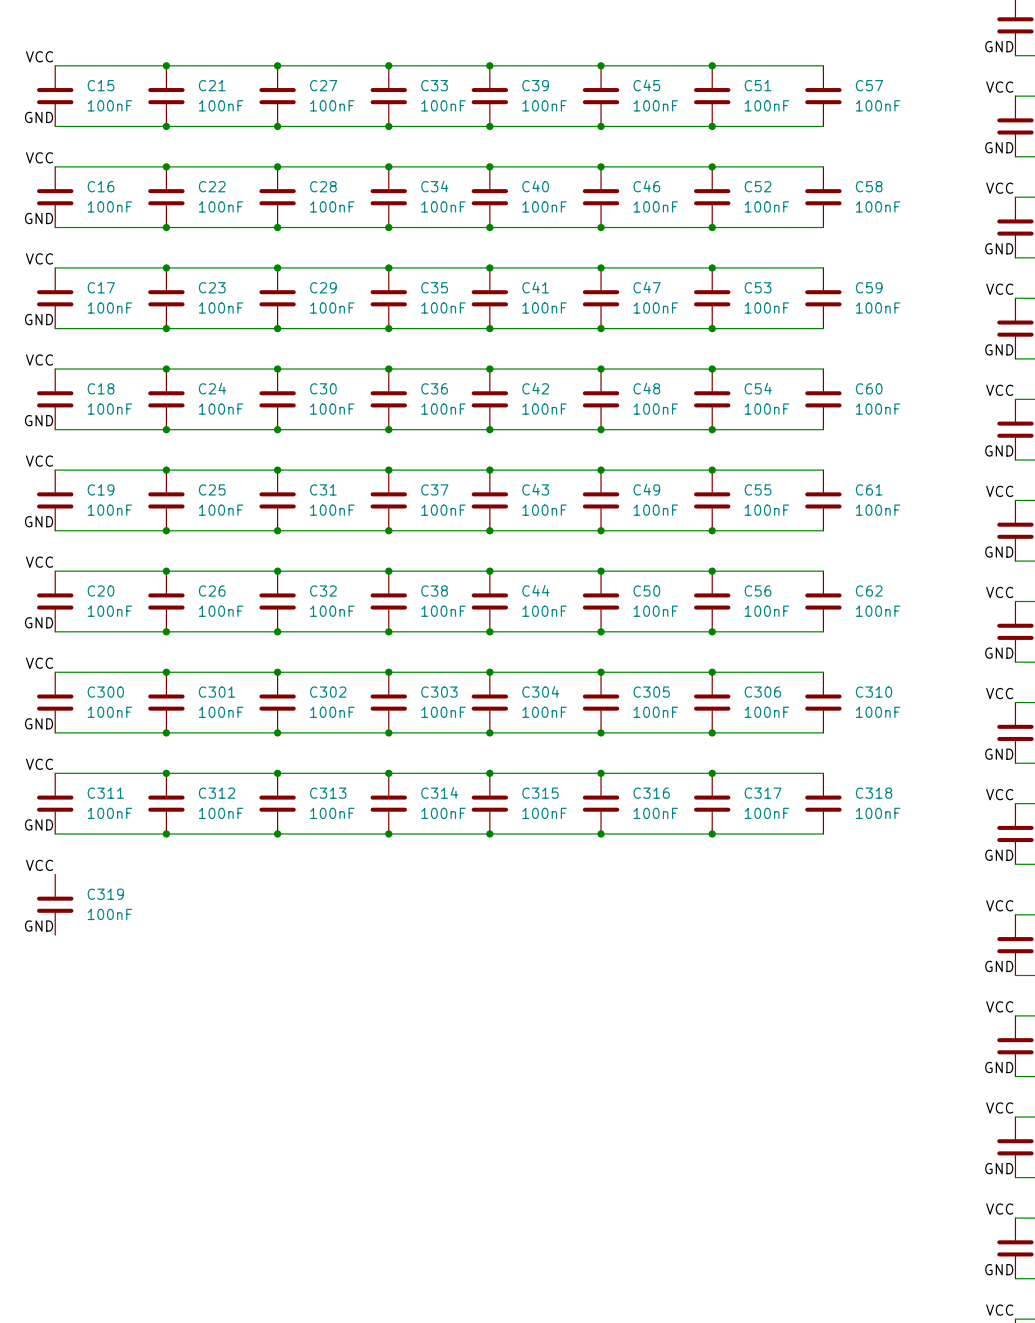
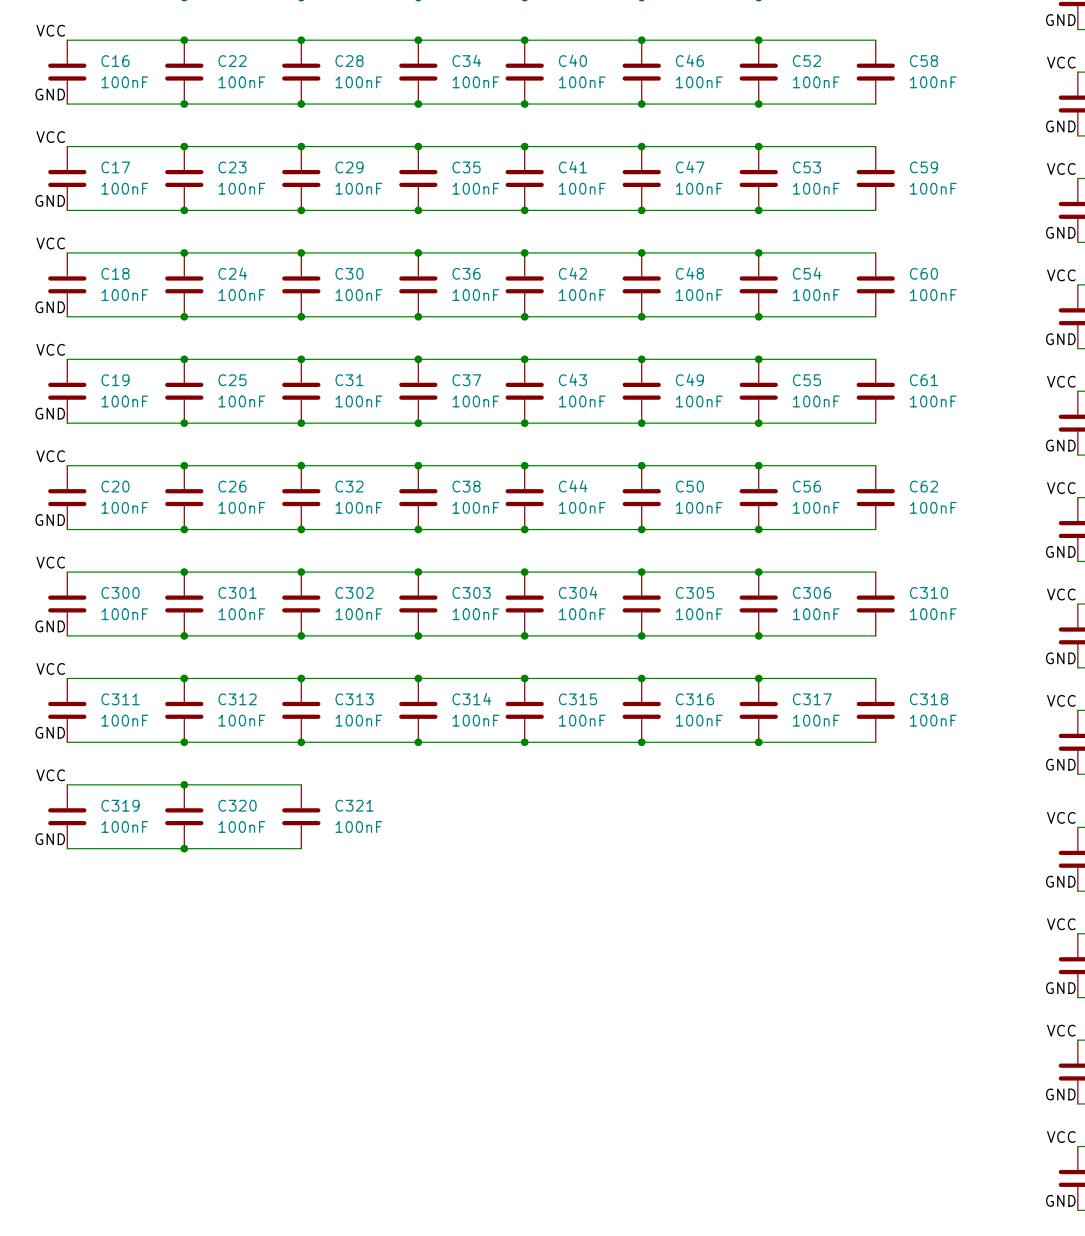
wire: none -> (67, 784) (301, 784)
junction: none -> (184, 784)
C320: none -> 100nF (184, 816)
C321: none -> 100nF (301, 816)
wire: none -> (67, 848) (301, 848)
junction: none -> (184, 848)

